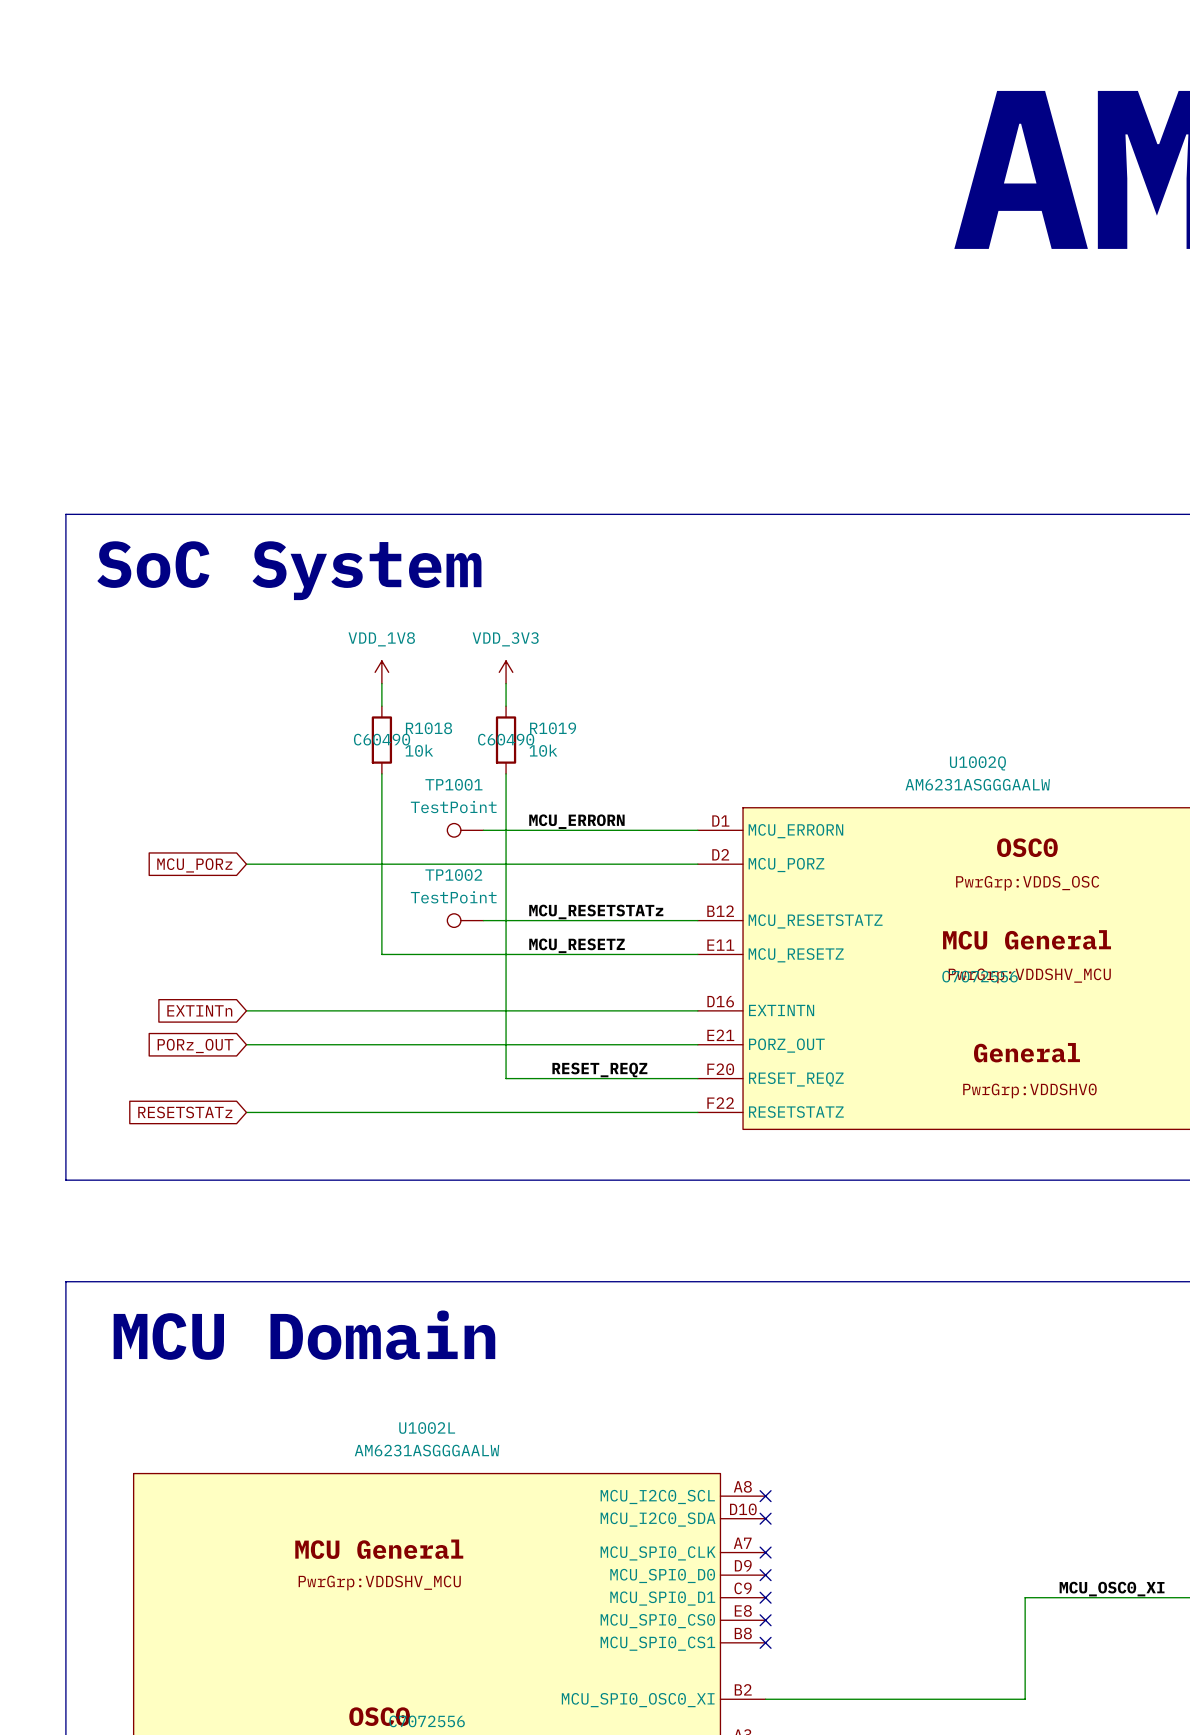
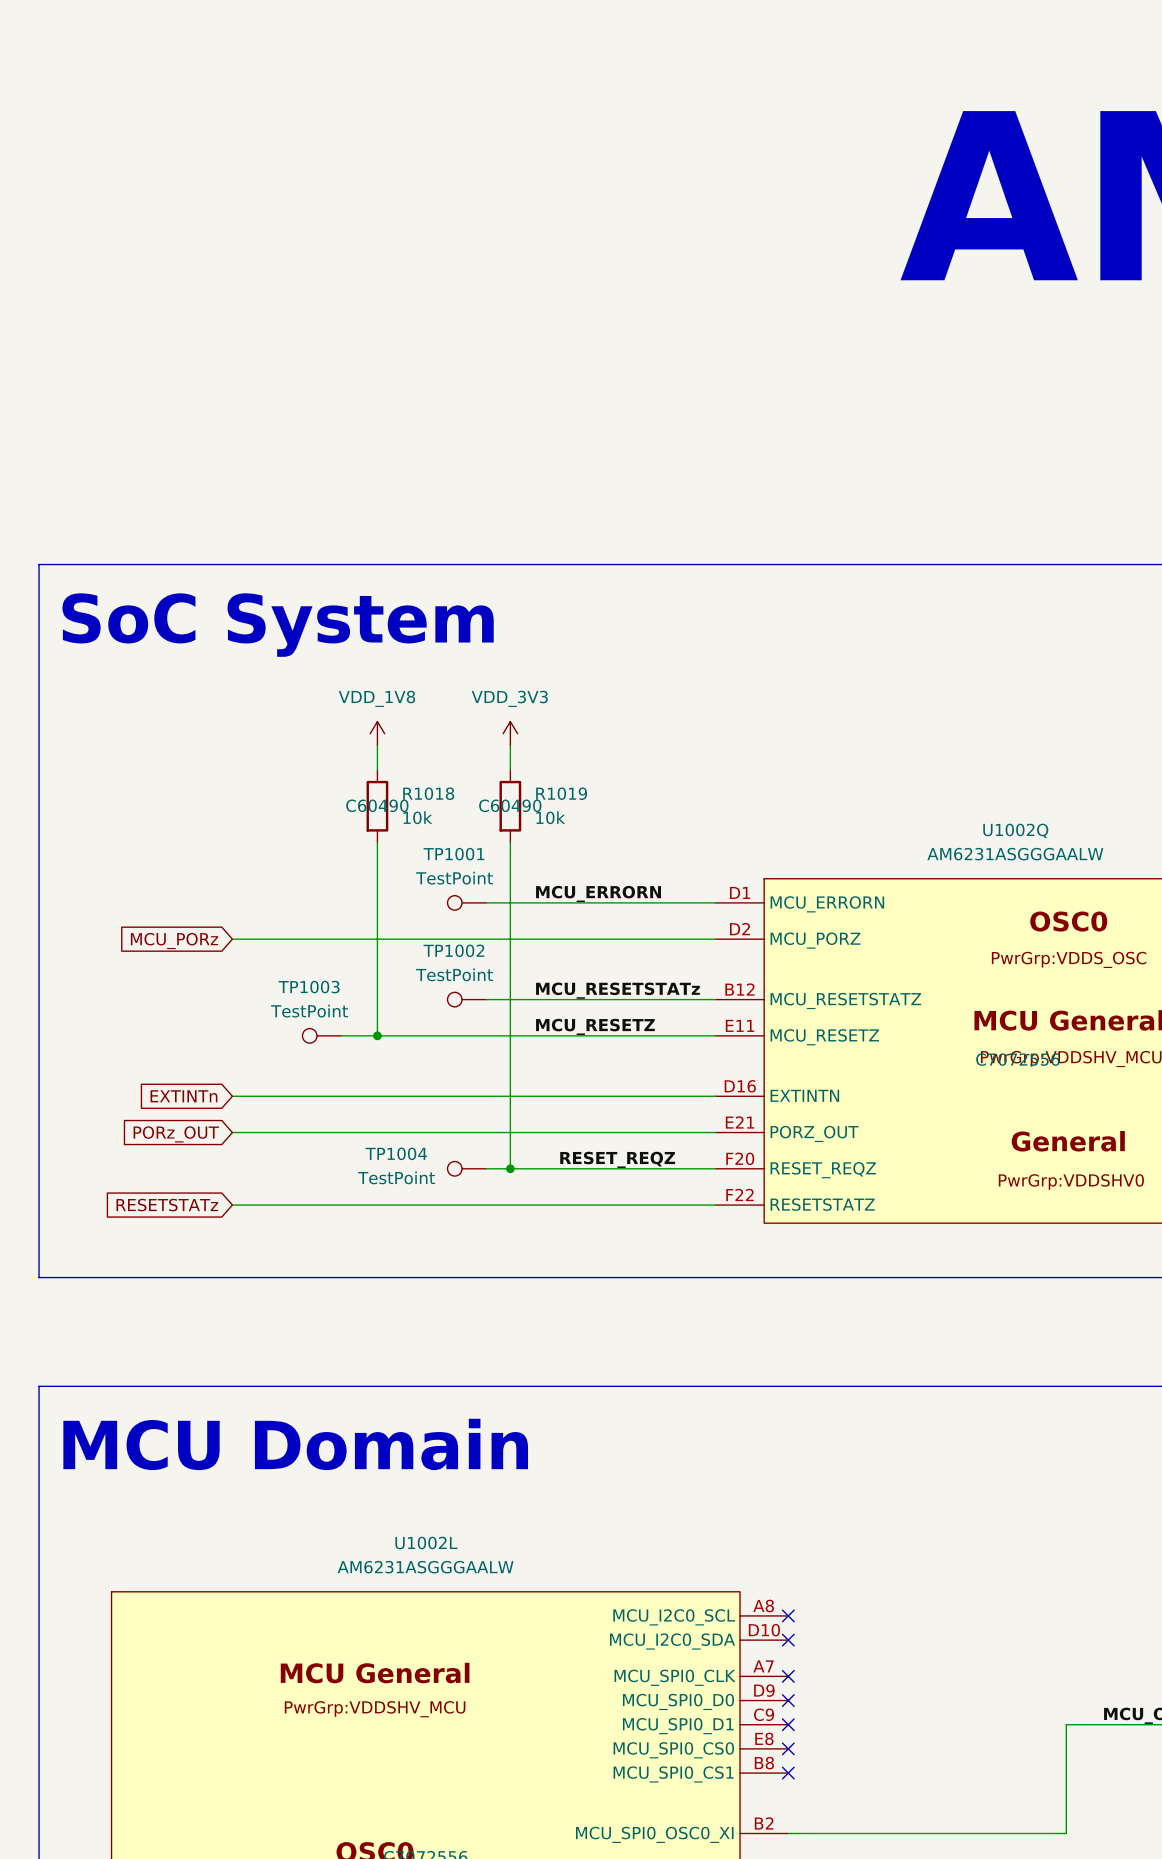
TP1003: none -> TestPoint (321, 1035)
wire: none -> (341, 1035) (377, 1035)
junction: none -> (377, 1035)
TP1004: none -> TestPoint (466, 1168)
wire: none -> (486, 1168) (510, 1168)
junction: none -> (510, 1168)

